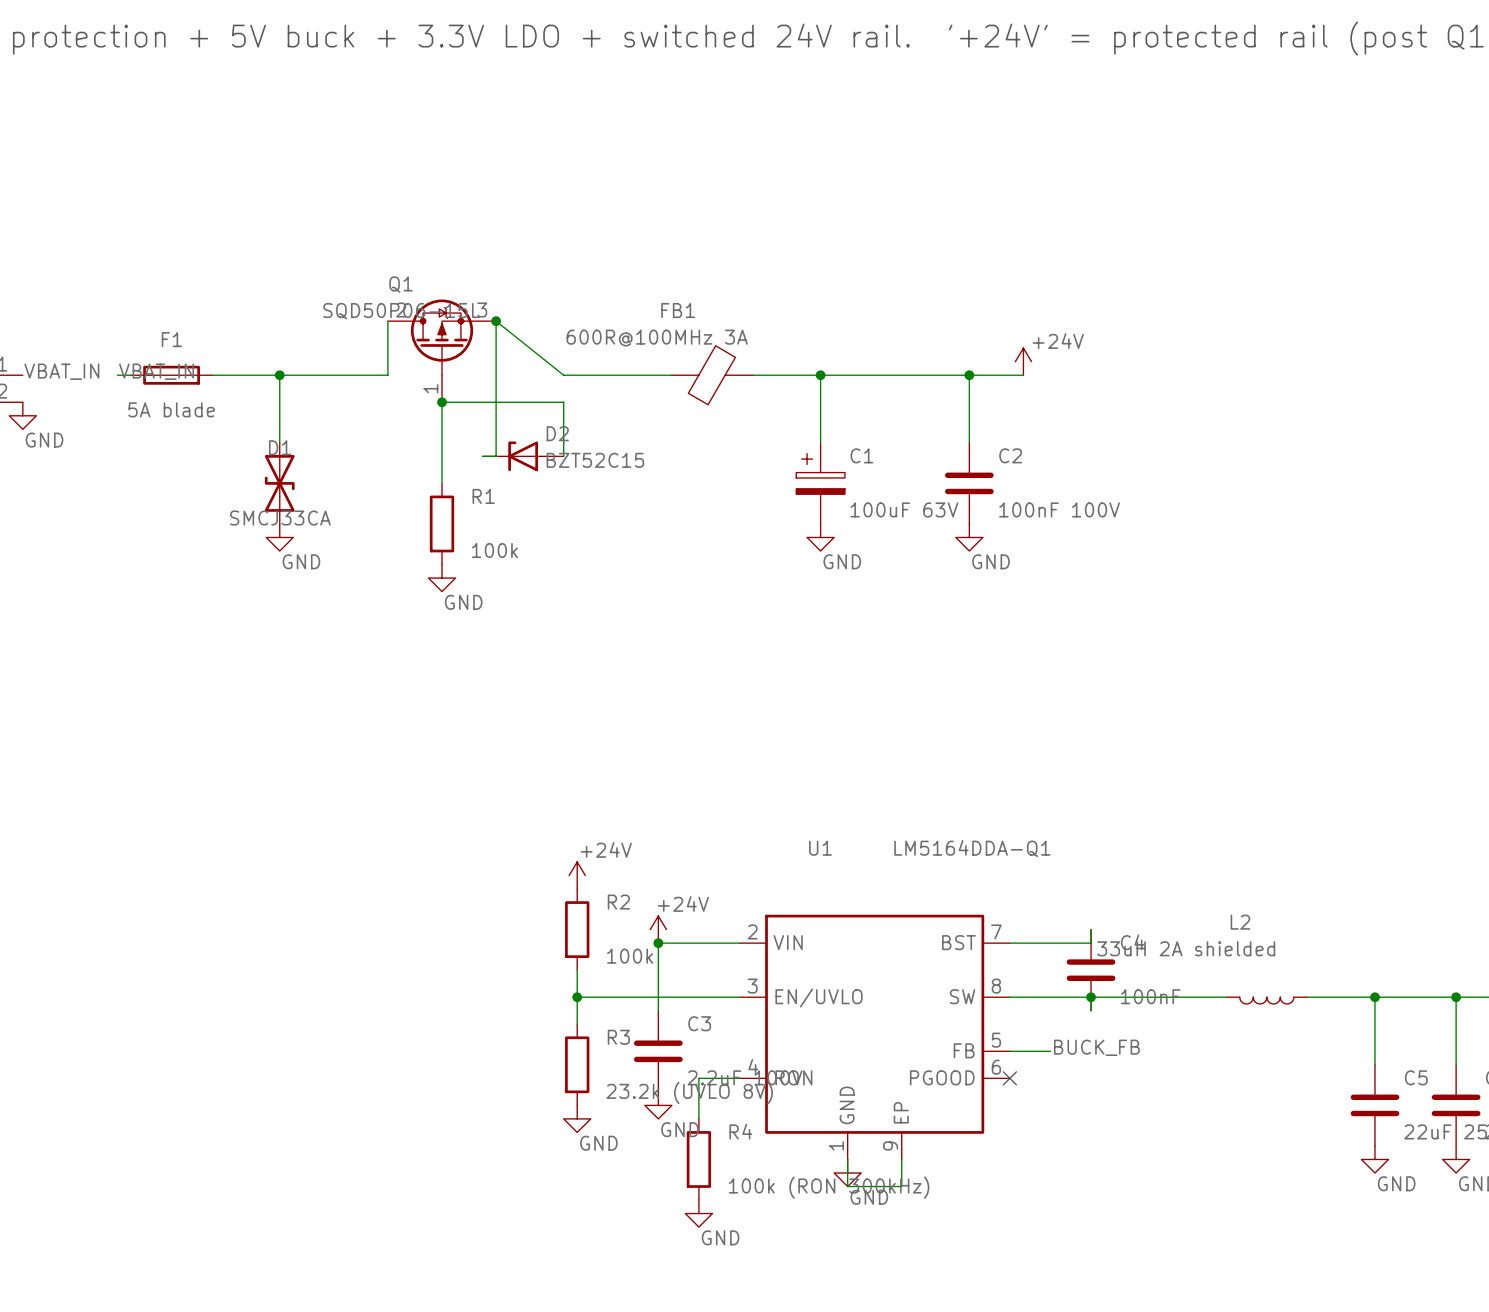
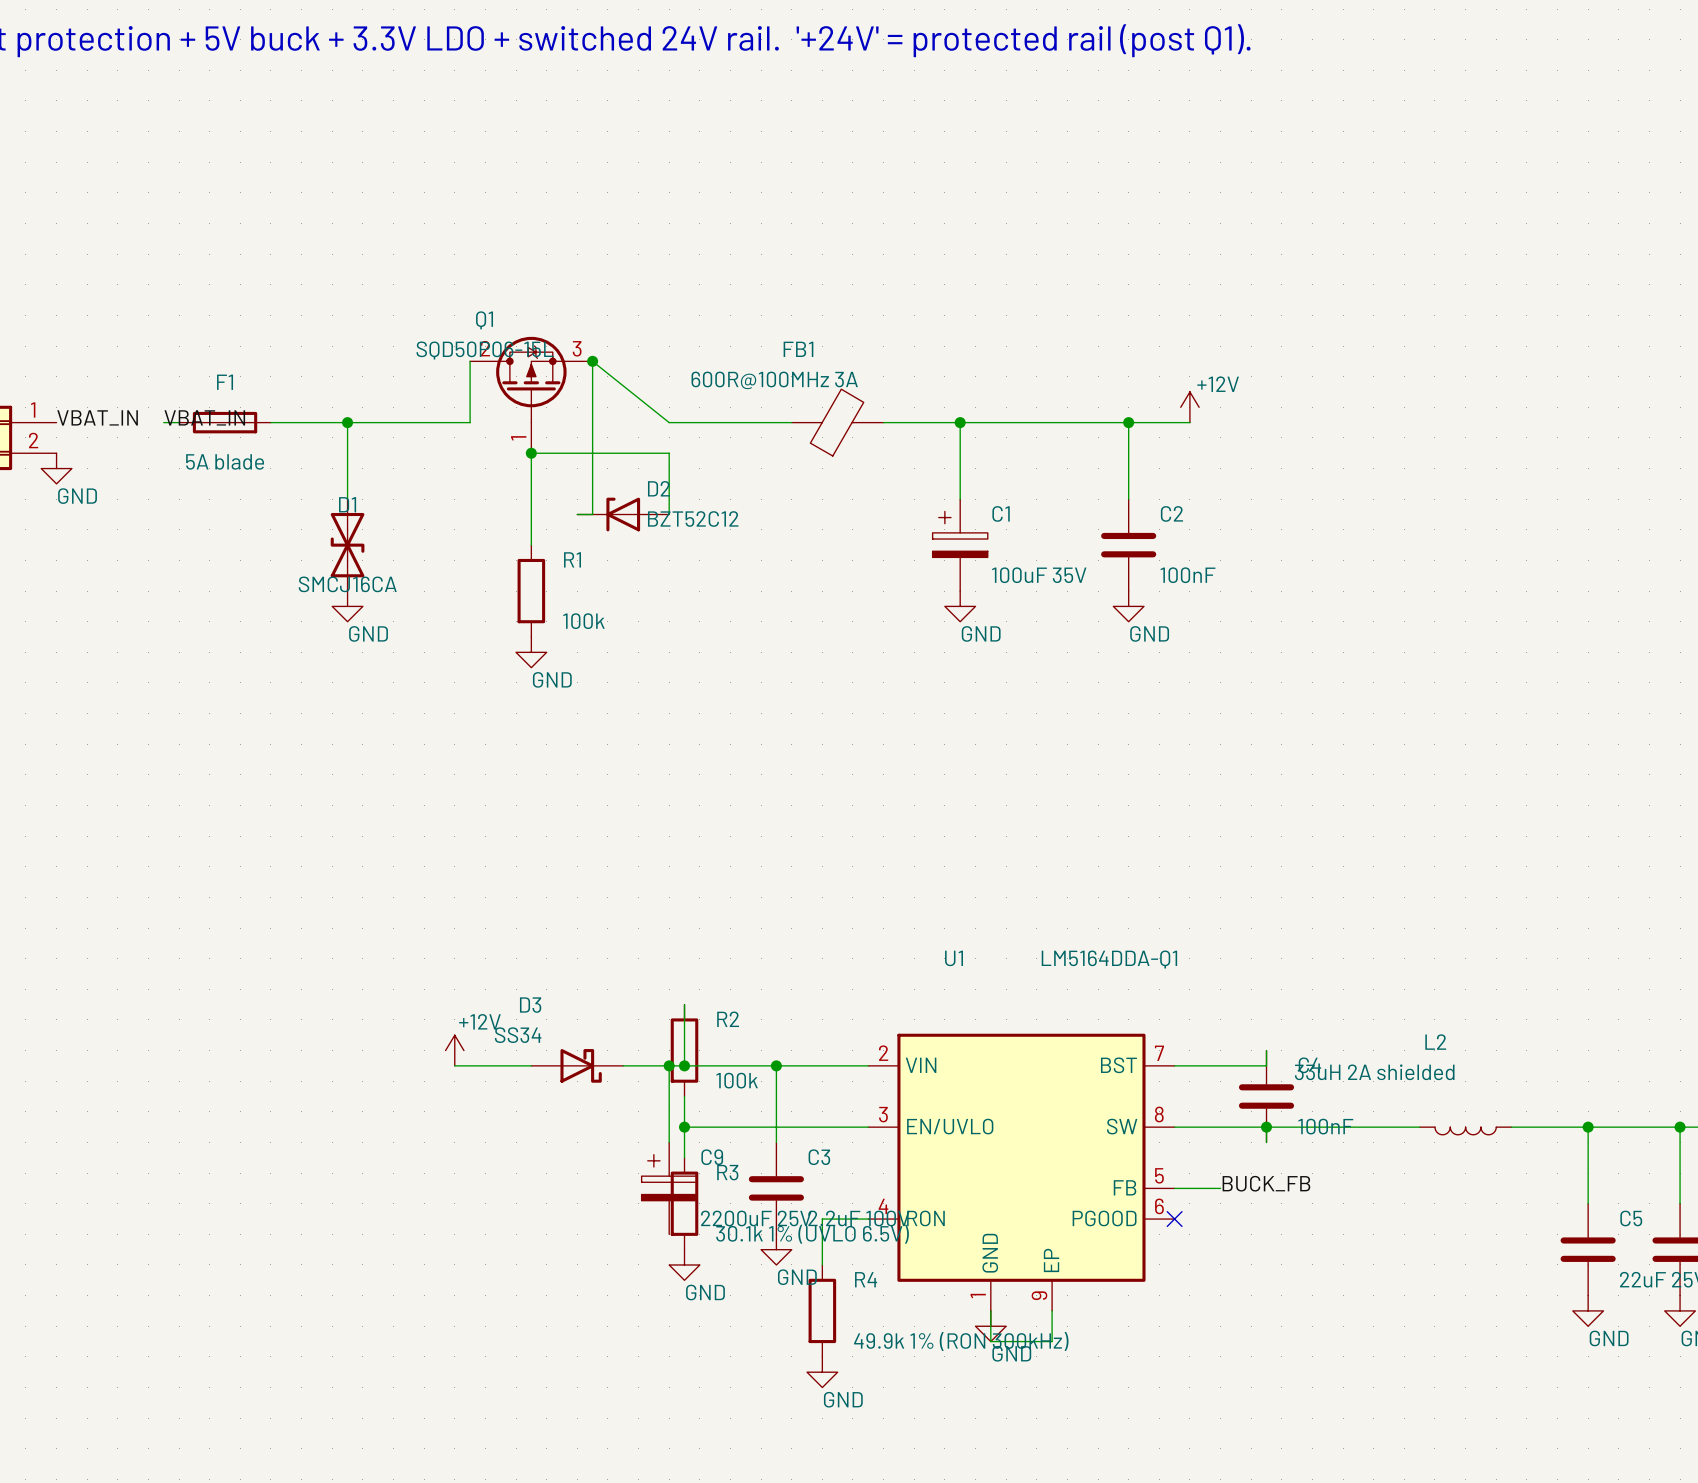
power symbol: +24V (1023, 361) -> +12V (1189, 407)
D2 value: BZT52C15 (595, 460) -> BZT52C12 (693, 519)
C1 value: 100uF 63V (904, 509) -> 100uF 35V (1039, 575)
C2 value: 100nF 100V (1059, 509) -> 100nF (1187, 575)
D1 value: SMCJ33CA (280, 518) -> SMCJ16CA (347, 584)
power symbol: +24V (577, 875) -> none
wire: none -> (684, 1004) (684, 1065)
power symbol: none -> +12V (454, 1050)
power symbol: +24V (658, 929) -> none
wire: none -> (454, 1065) (531, 1065)
D3: none -> SS34 (577, 1065)
wire: none -> (623, 1065) (776, 1065)
wire: none -> (669, 1065) (669, 1142)
junction: none -> (669, 1065)
junction: none -> (684, 1065)
C9: none -> 2200uF 25V (669, 1188)
R3 value: 23.2k (UVLO 8V) (689, 1092) -> 30.1k 1% (UVLO 6.5V) (812, 1234)
R4 value: 100k (RON 300kHz) (829, 1187) -> 49.9k 1% (RON 300kHz) (961, 1341)

